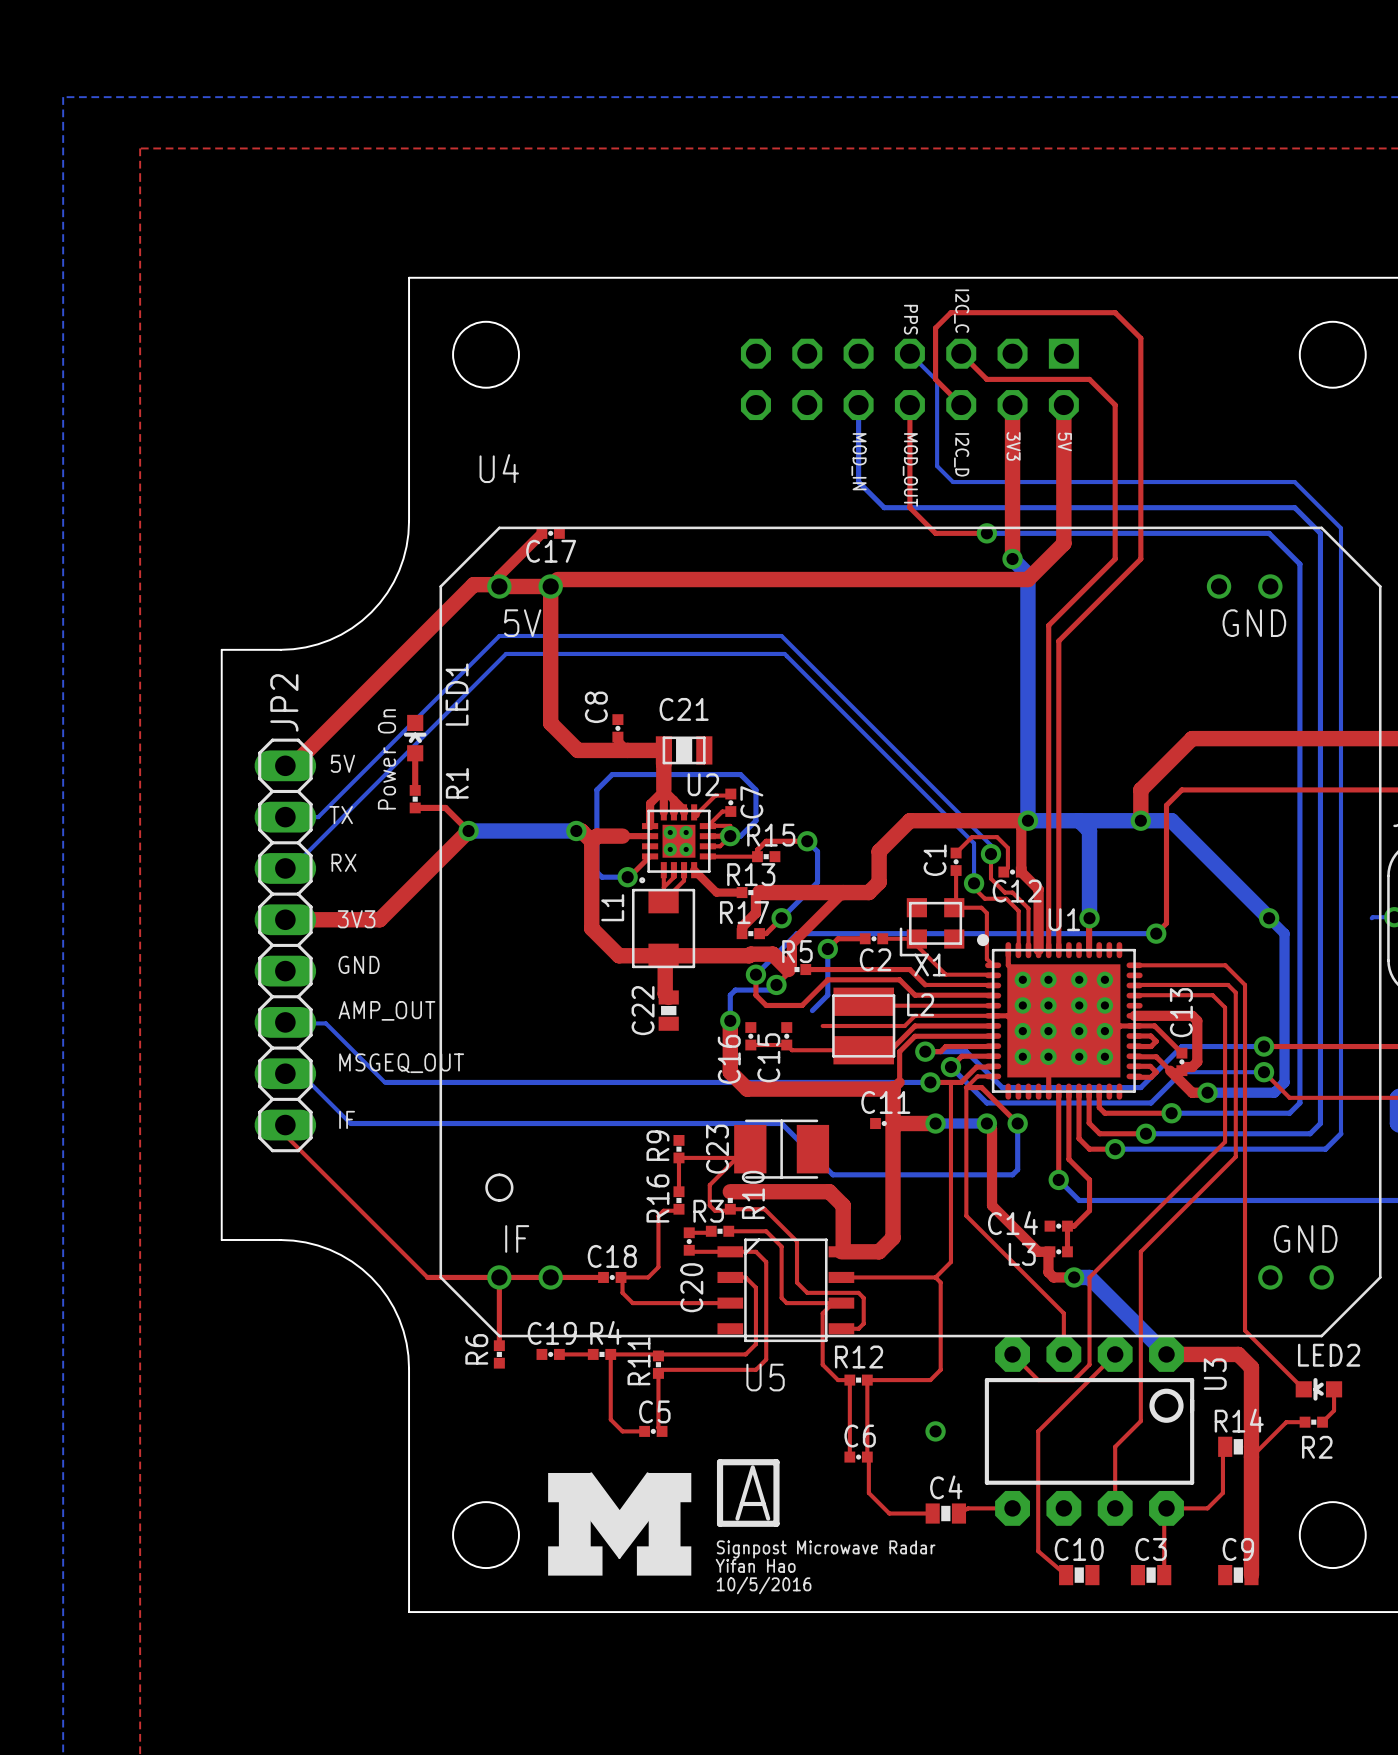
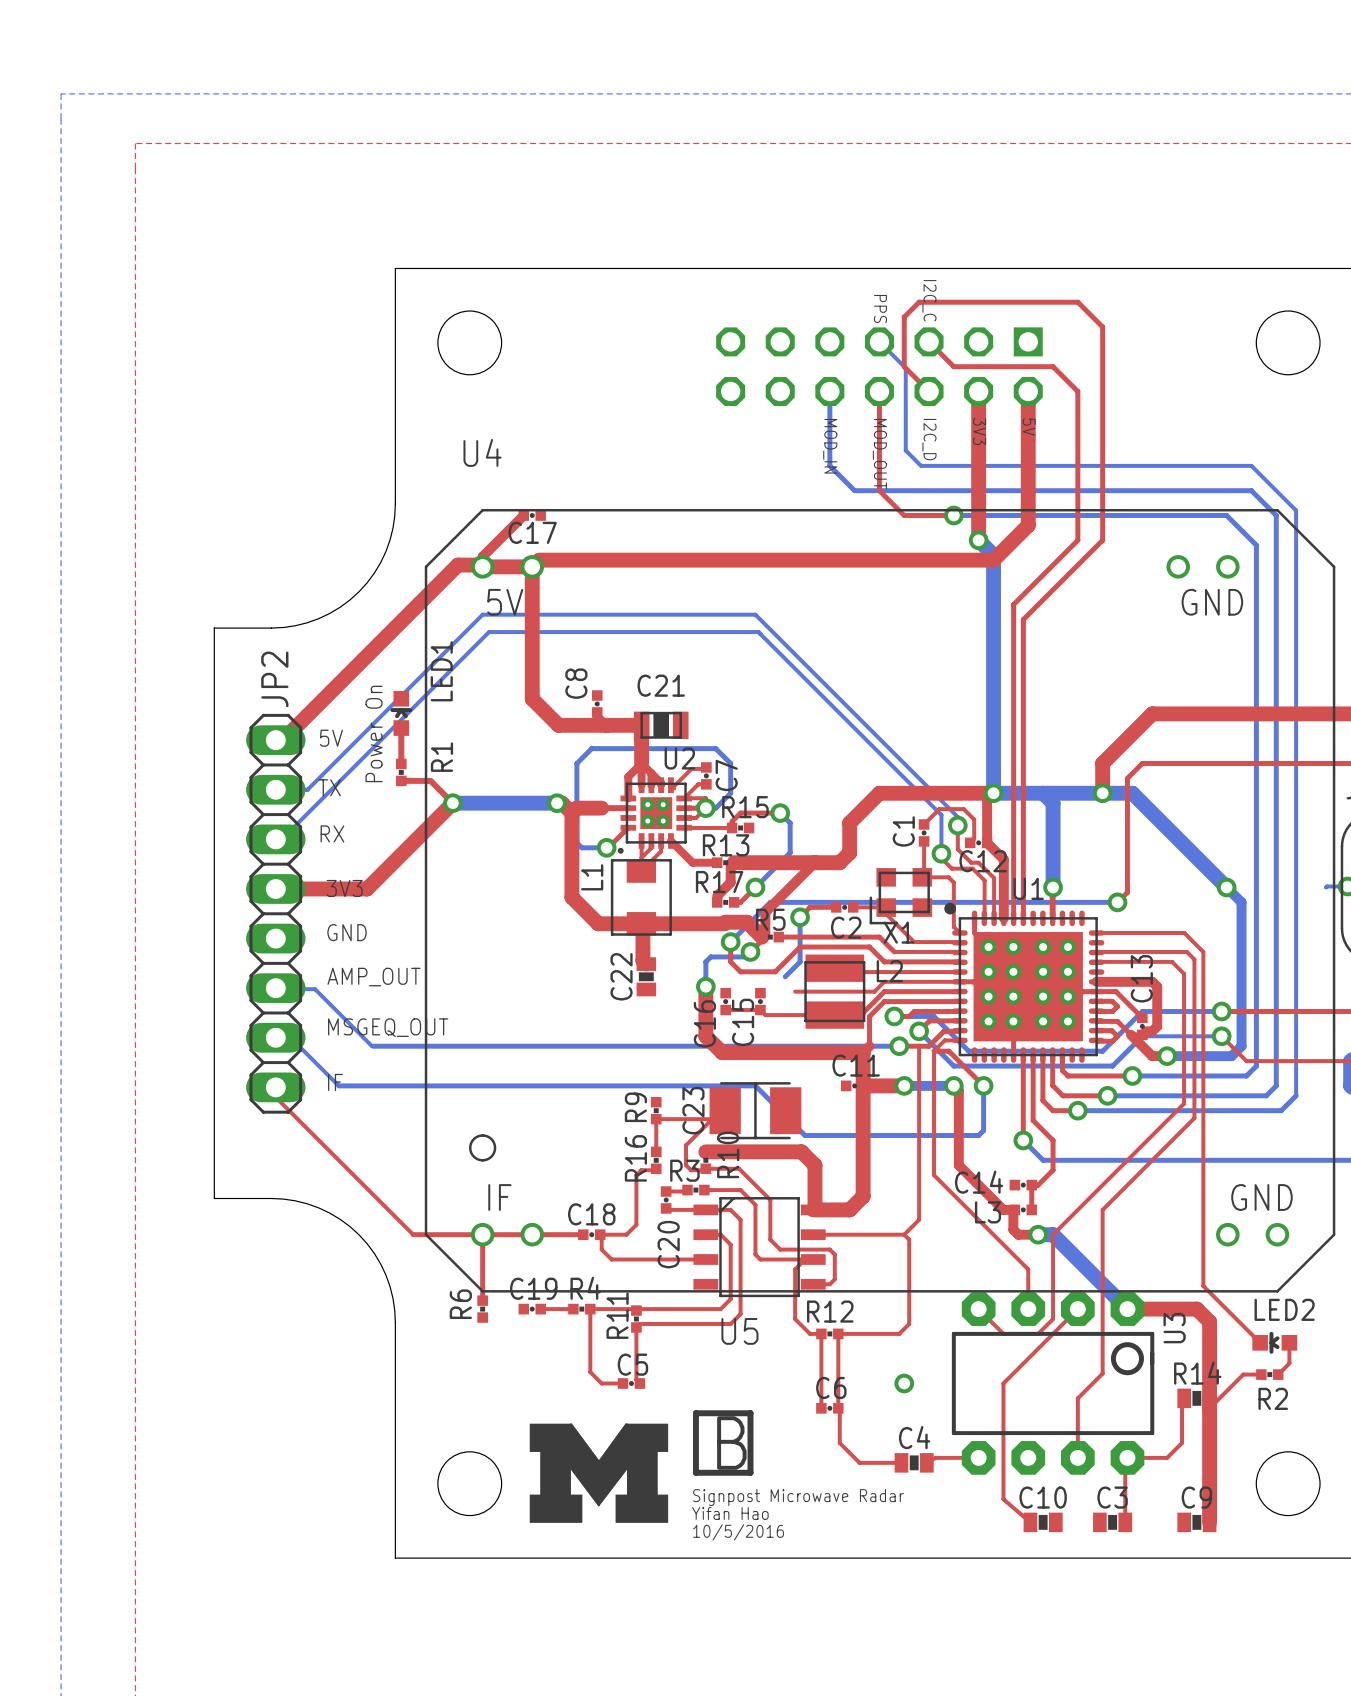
text: A (752, 1492) -> B (731, 1443)

